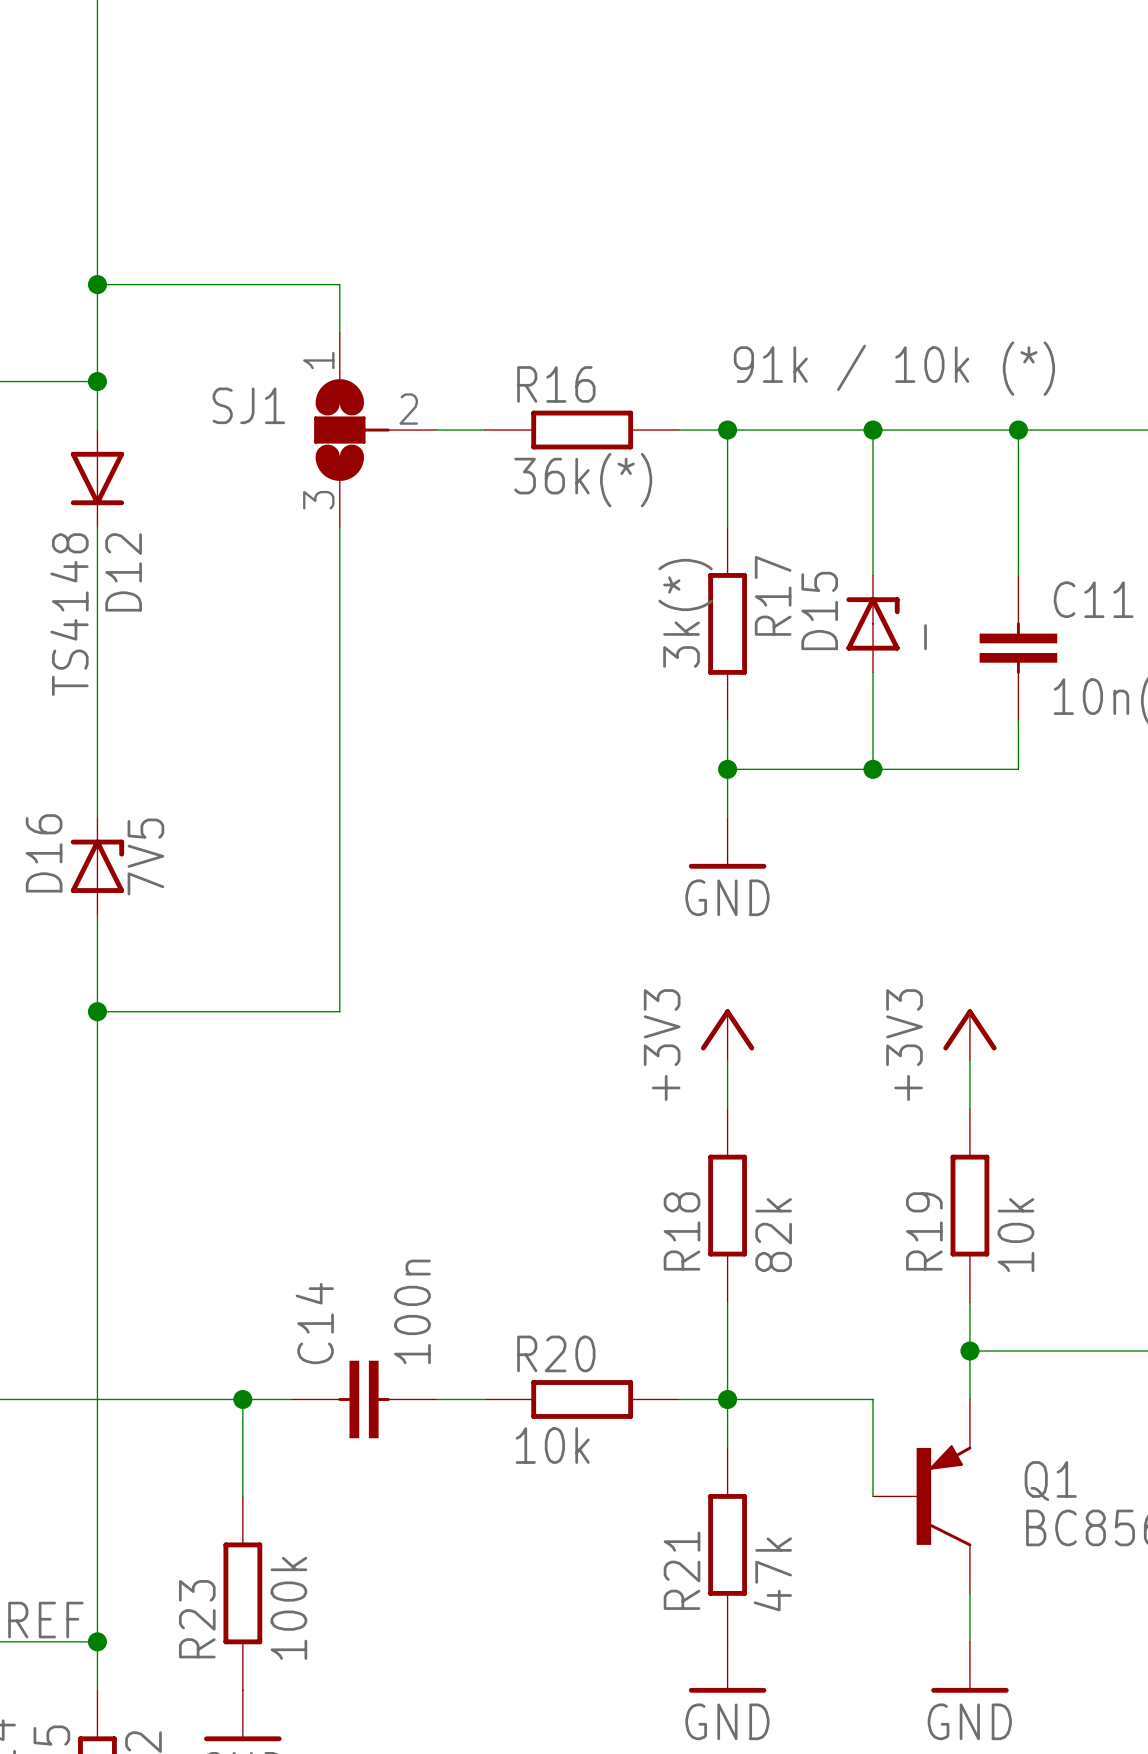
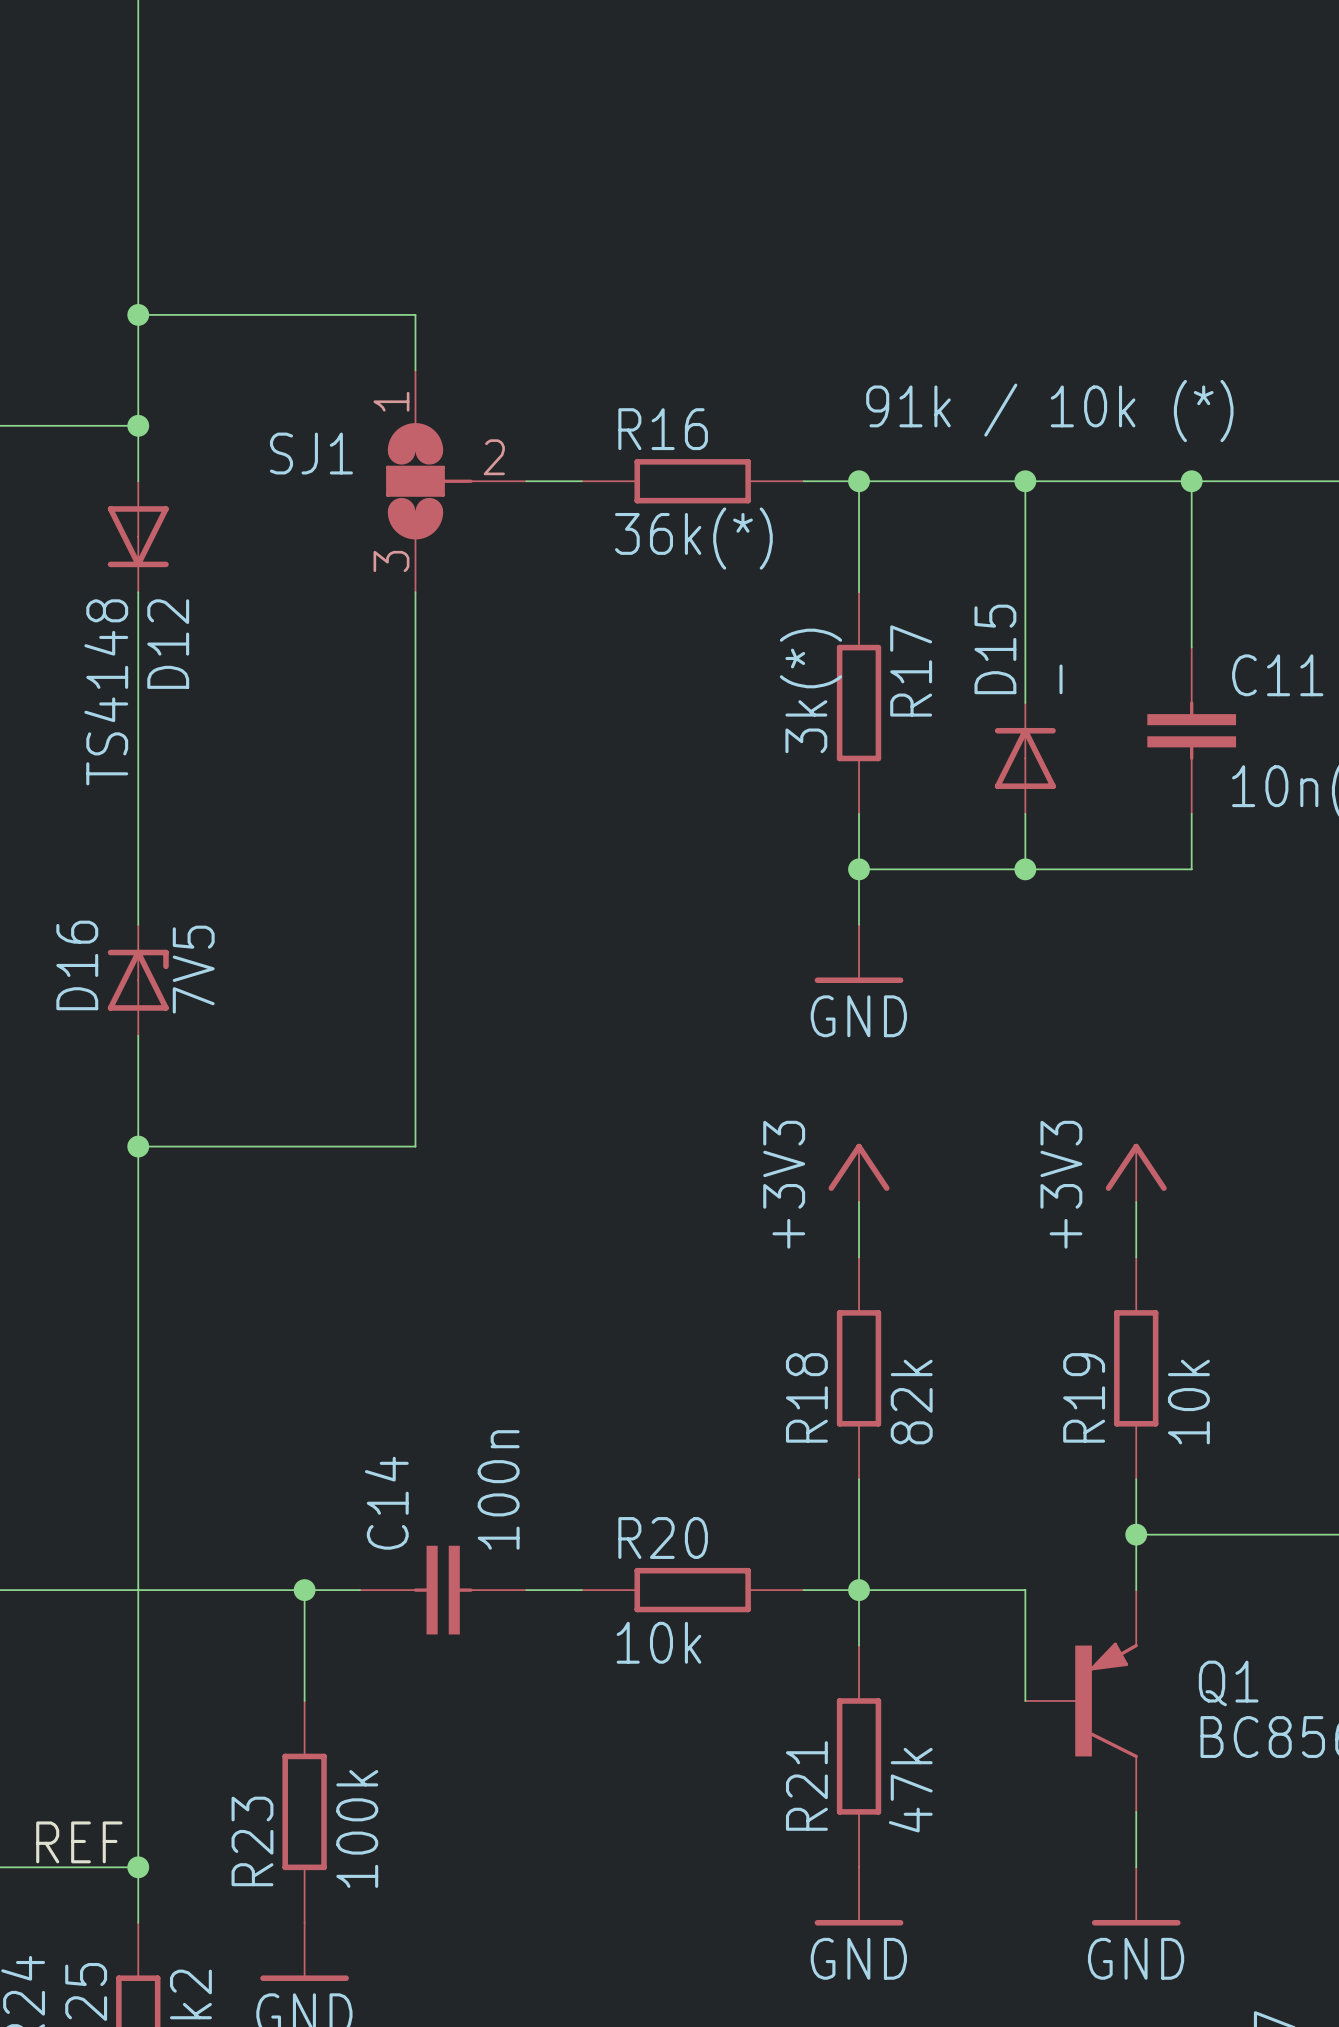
D15 symbol: [846, 575, 900, 673] -> [994, 703, 1056, 814]
D15 name position: D15 (819, 610) -> D15 (995, 649)
D15 value position: - (925, 637) -> - (1061, 679)

